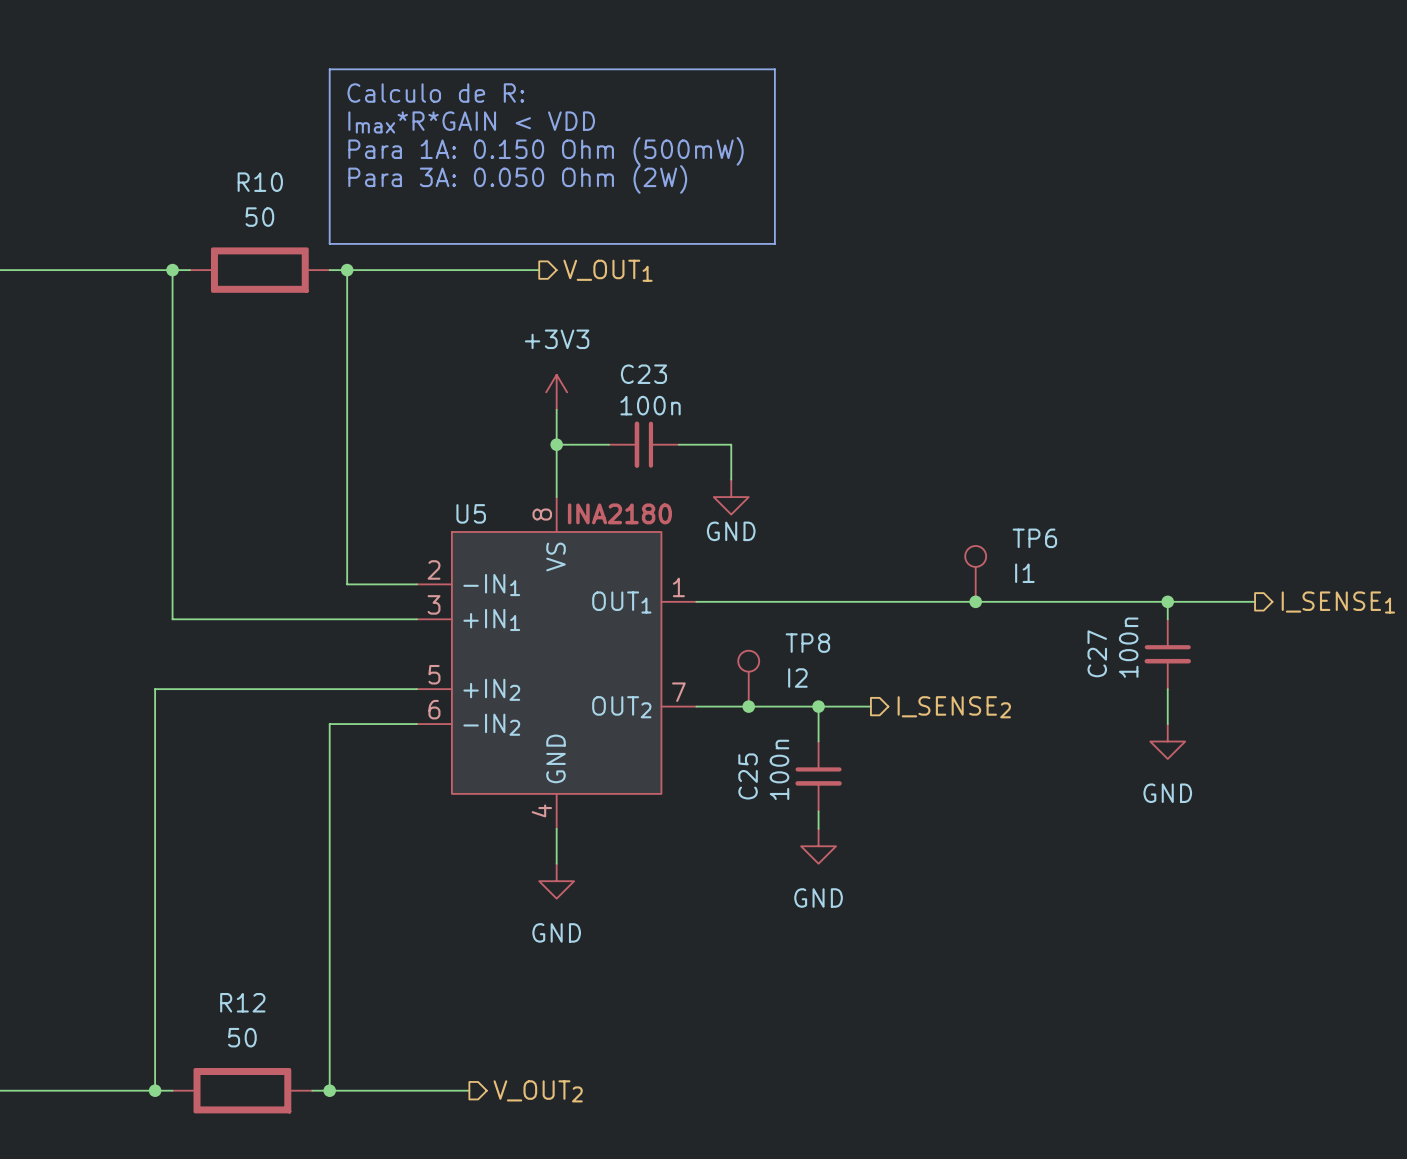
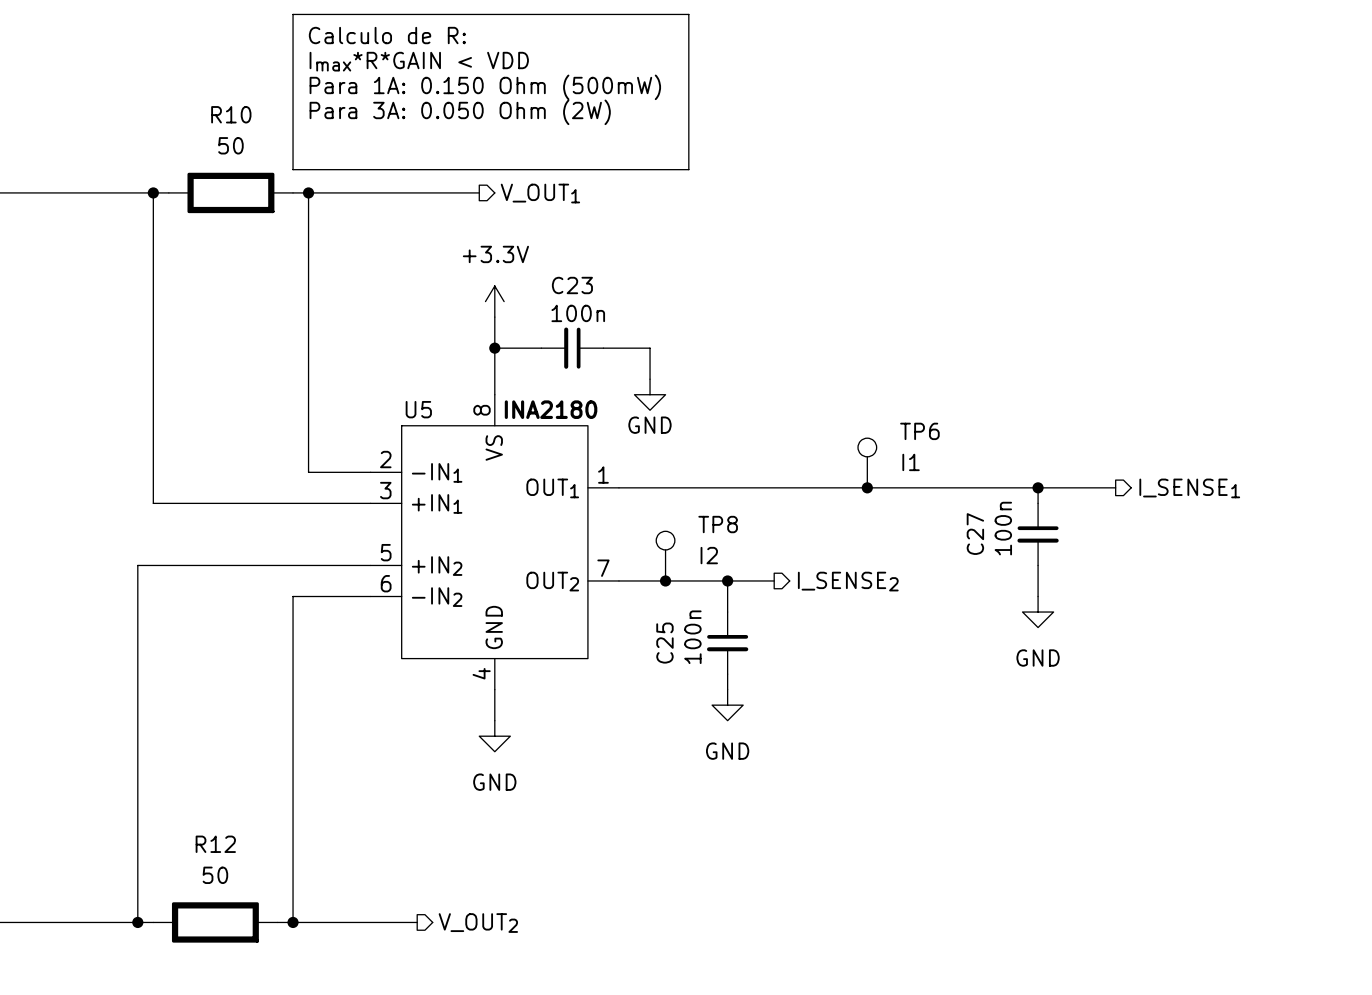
power symbol: +3V3 (556, 392) -> +3.3V (494, 301)

